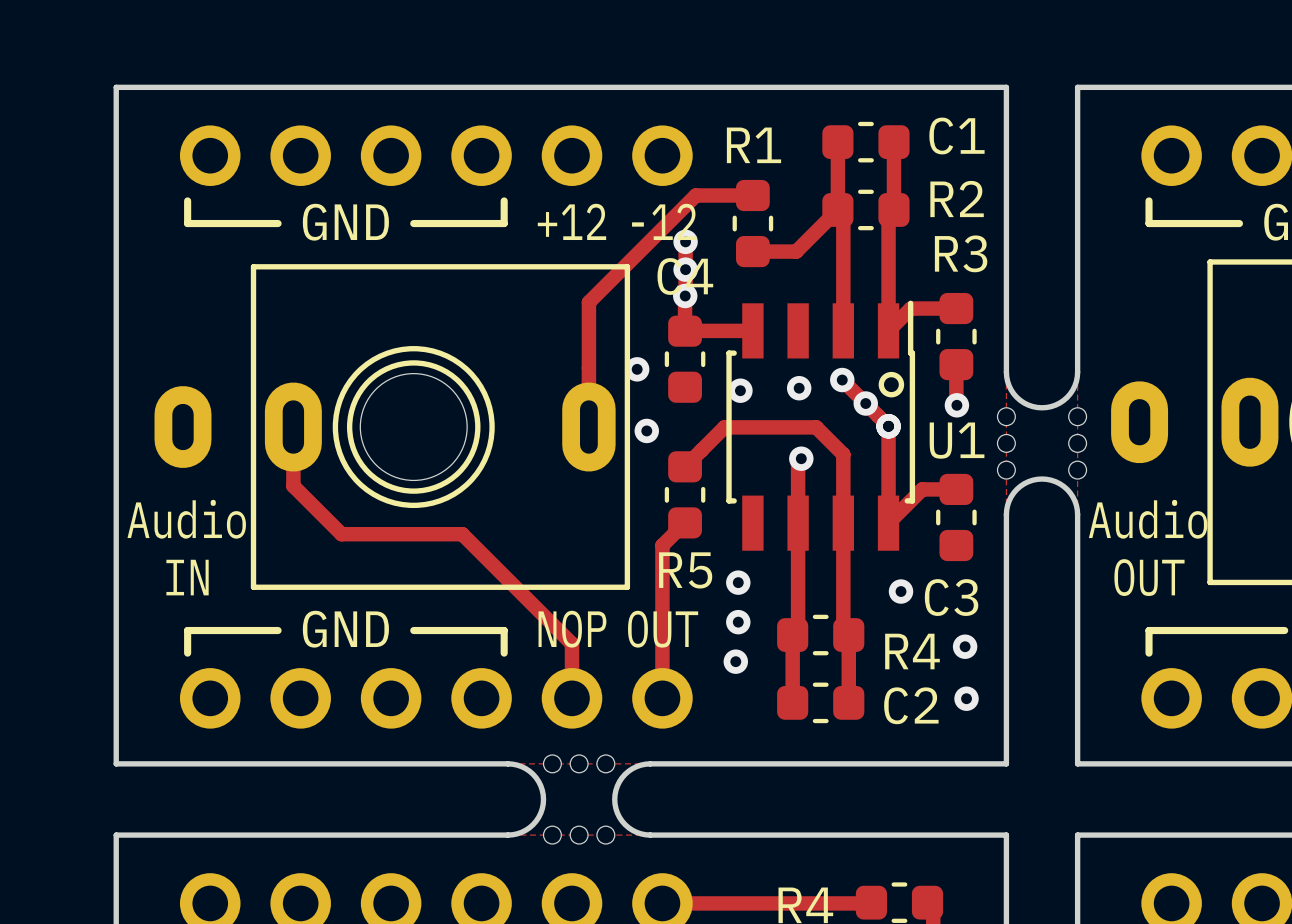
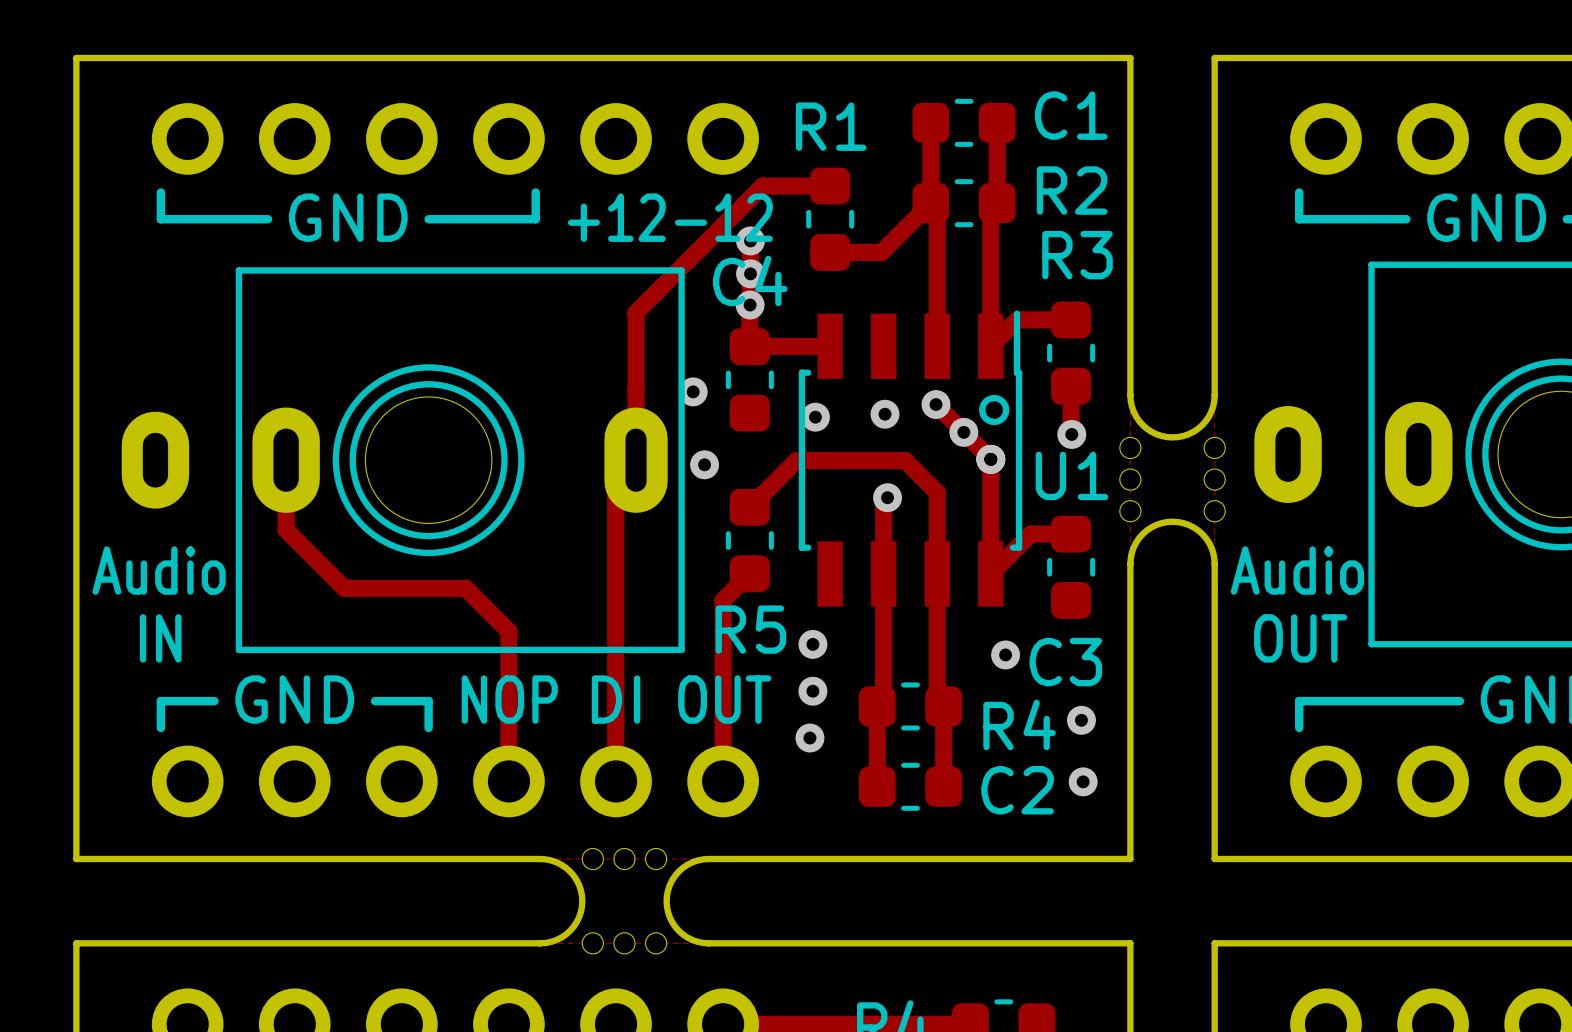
track: none -> (636, 460) (615, 480) (615, 781)
track: (341, 534) (462, 534) (572, 643) (572, 698) -> (343, 587) (465, 588) (508, 631) (508, 781)
text position: GND (345, 629) -> GND (294, 699)
text: none -> NOP (509, 699)
text: NOP (572, 629) -> DI (616, 699)
line: (232, 630) (278, 630) -> none
line: none -> (375, 701) (428, 701) (428, 727)
line: (413, 630) (504, 630) (504, 653) -> none

